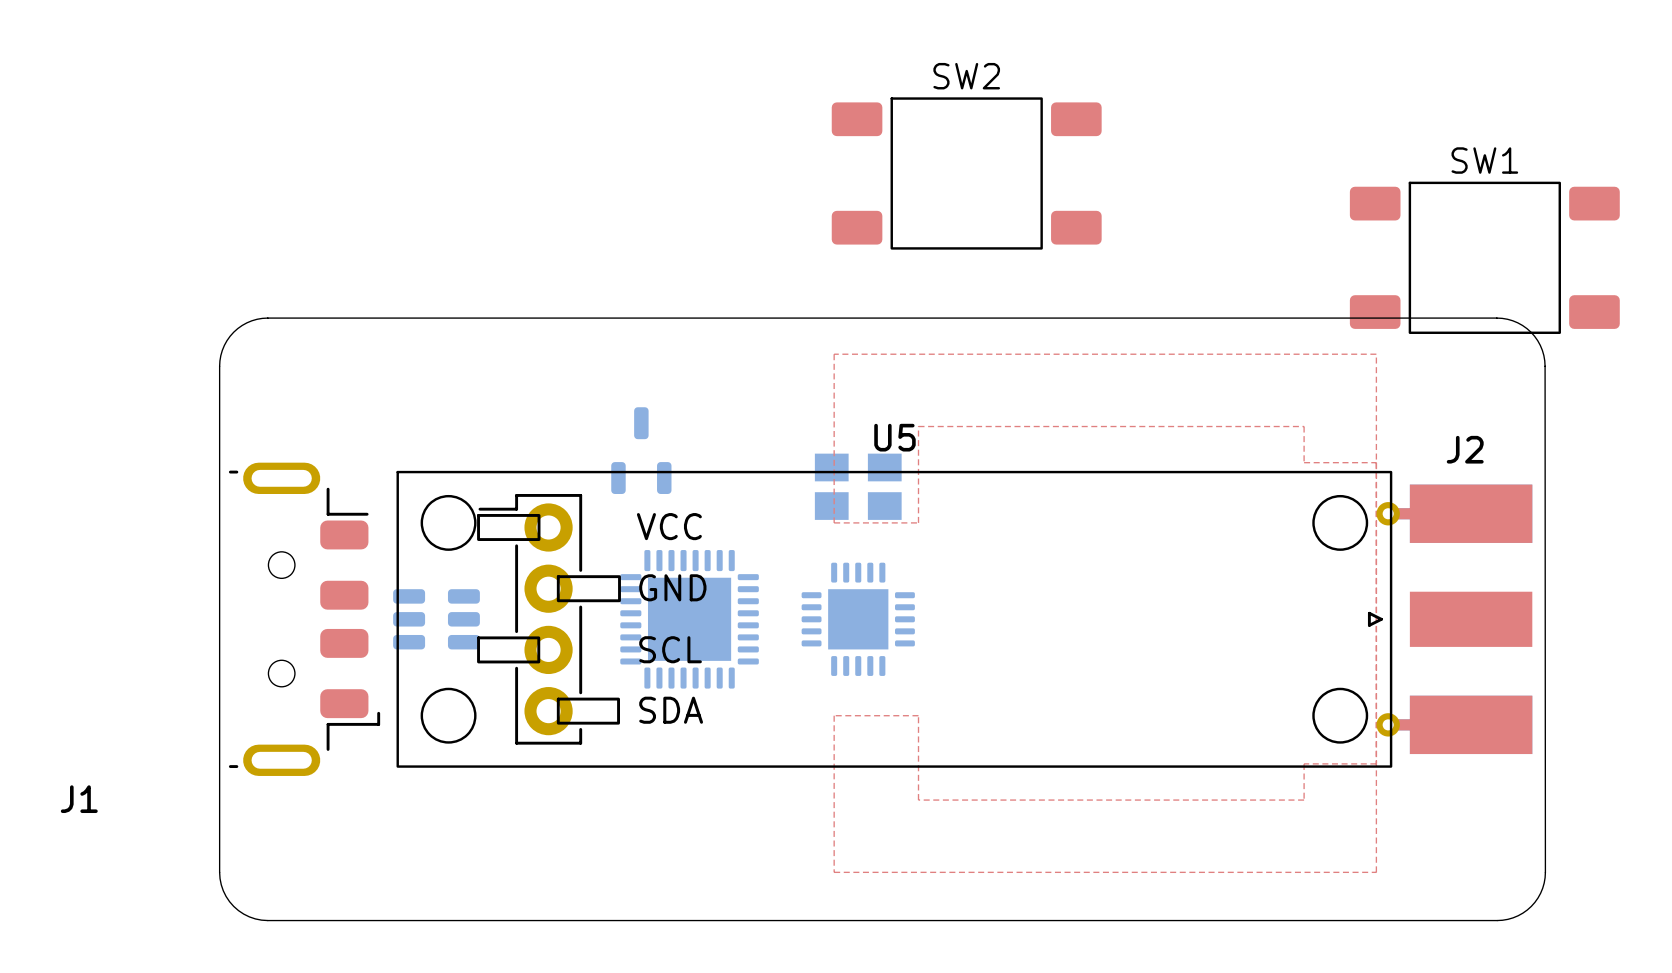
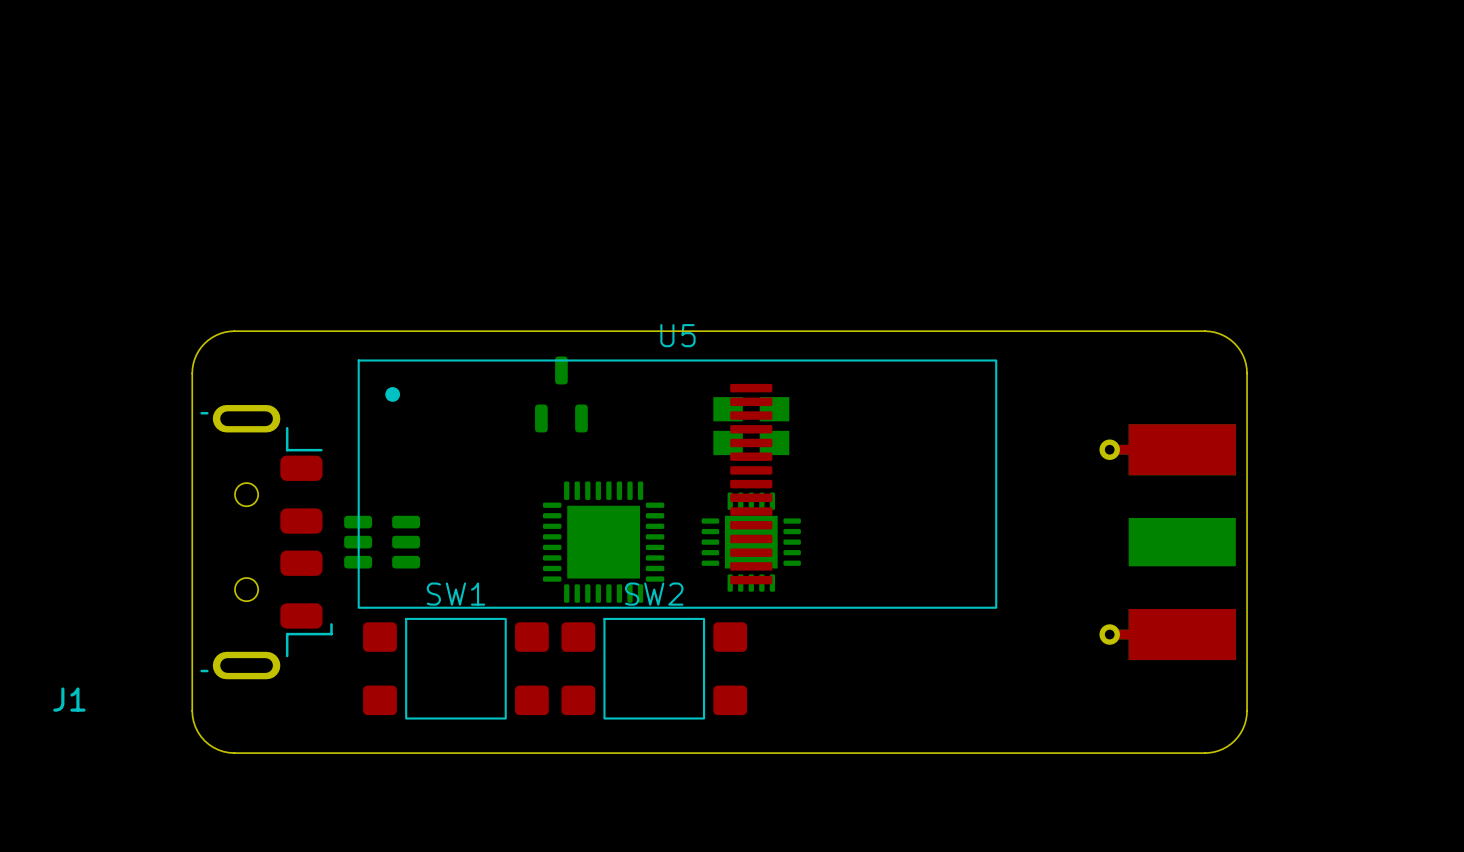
SW2 footprint: [831, 97, 1102, 250] -> [561, 617, 748, 720]
SW1 footprint: [1349, 181, 1620, 334] -> [363, 617, 549, 720]
board edge: (219, 426) (219, 366) (222, 350) (227, 340) (237, 328) (246, 322) (262, 318) (1496, 318) (1512, 320) (1526, 328) (1534, 336) (1542, 350) (1544, 360) (1545, 872) (1542, 888) (1531, 906) (1513, 917) (1497, 920) (267, 920) (255, 918) (243, 914) (233, 906) (223, 890) (219, 872) (219, 812) -> (192, 373) (196, 355) (204, 343) (220, 333) (234, 331) (1204, 331) (1223, 335) (1234, 343) (1242, 355) (1247, 373) (1246, 715) (1242, 729) (1237, 737) (1227, 746) (1218, 750) (1204, 753) (234, 753) (218, 749) (204, 740) (195, 727) (192, 710)
top zone outline: (1376, 462) (1304, 462) (1304, 426) (918, 426) (918, 522) (834, 522) (834, 354) (1376, 354) (1376, 872) (834, 872) (834, 715) (918, 715) (918, 800) (1304, 800) (1304, 763) (1376, 763) -> none
U5 footprint: [396, 470, 1393, 768] -> [357, 359, 998, 609]
J2 side: top (1450, 619) -> bottom (1167, 542)

